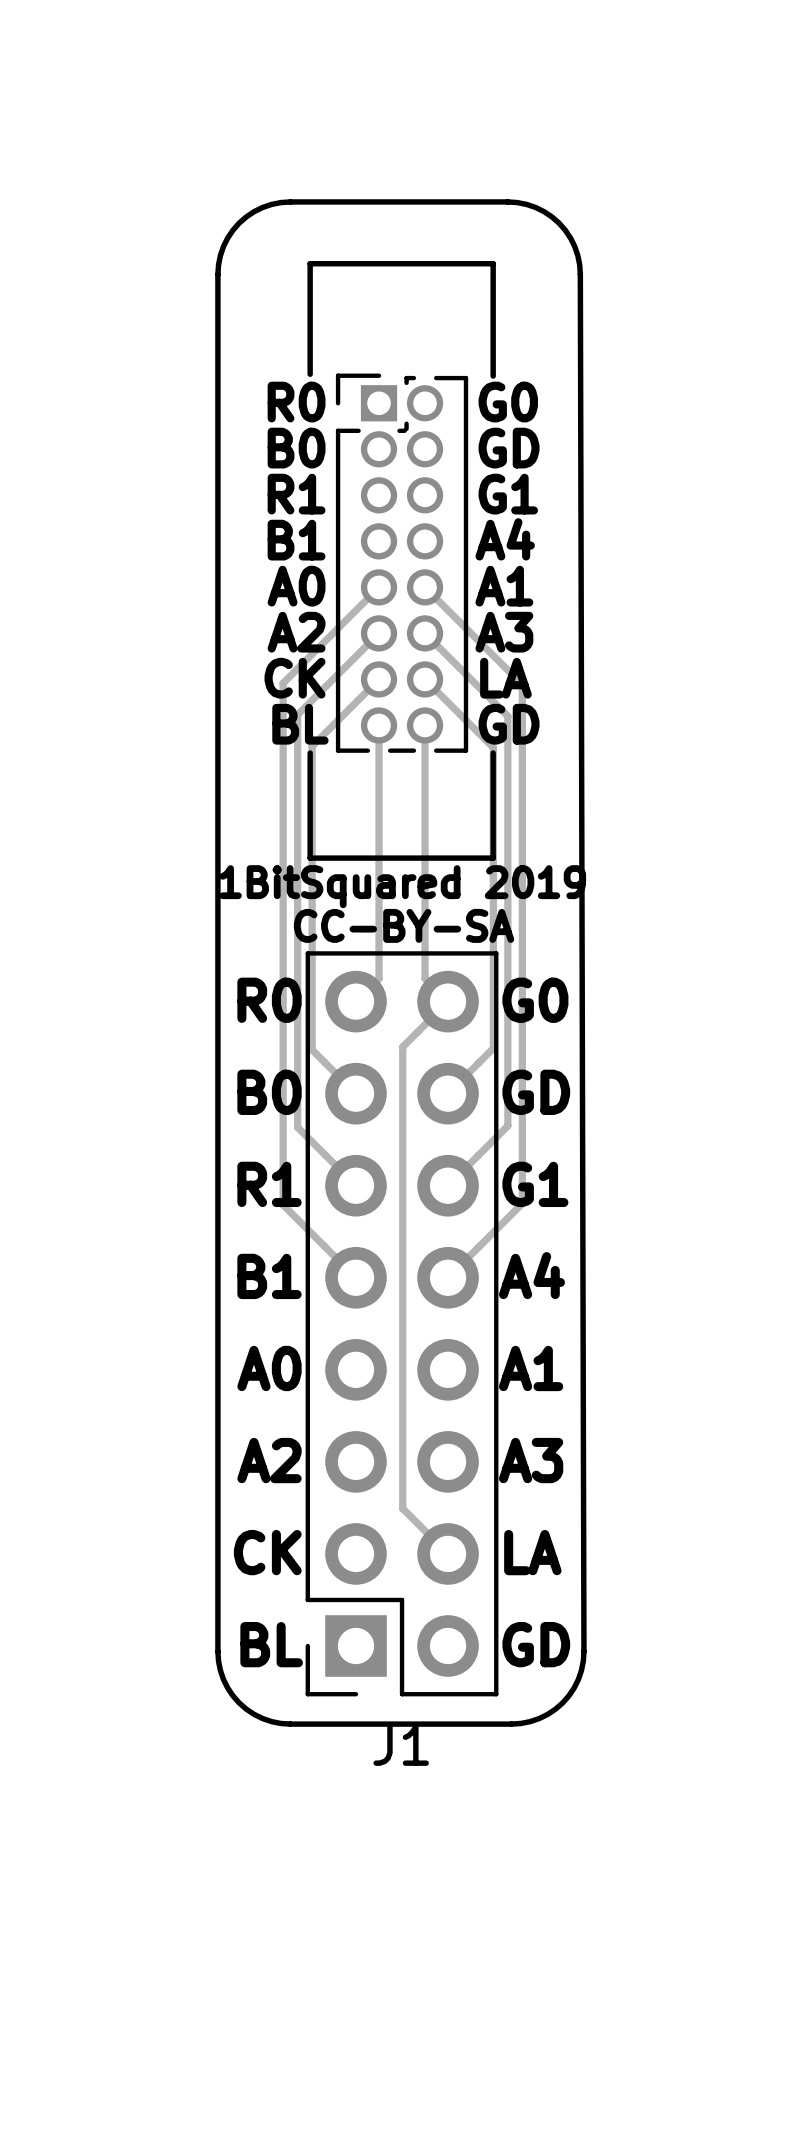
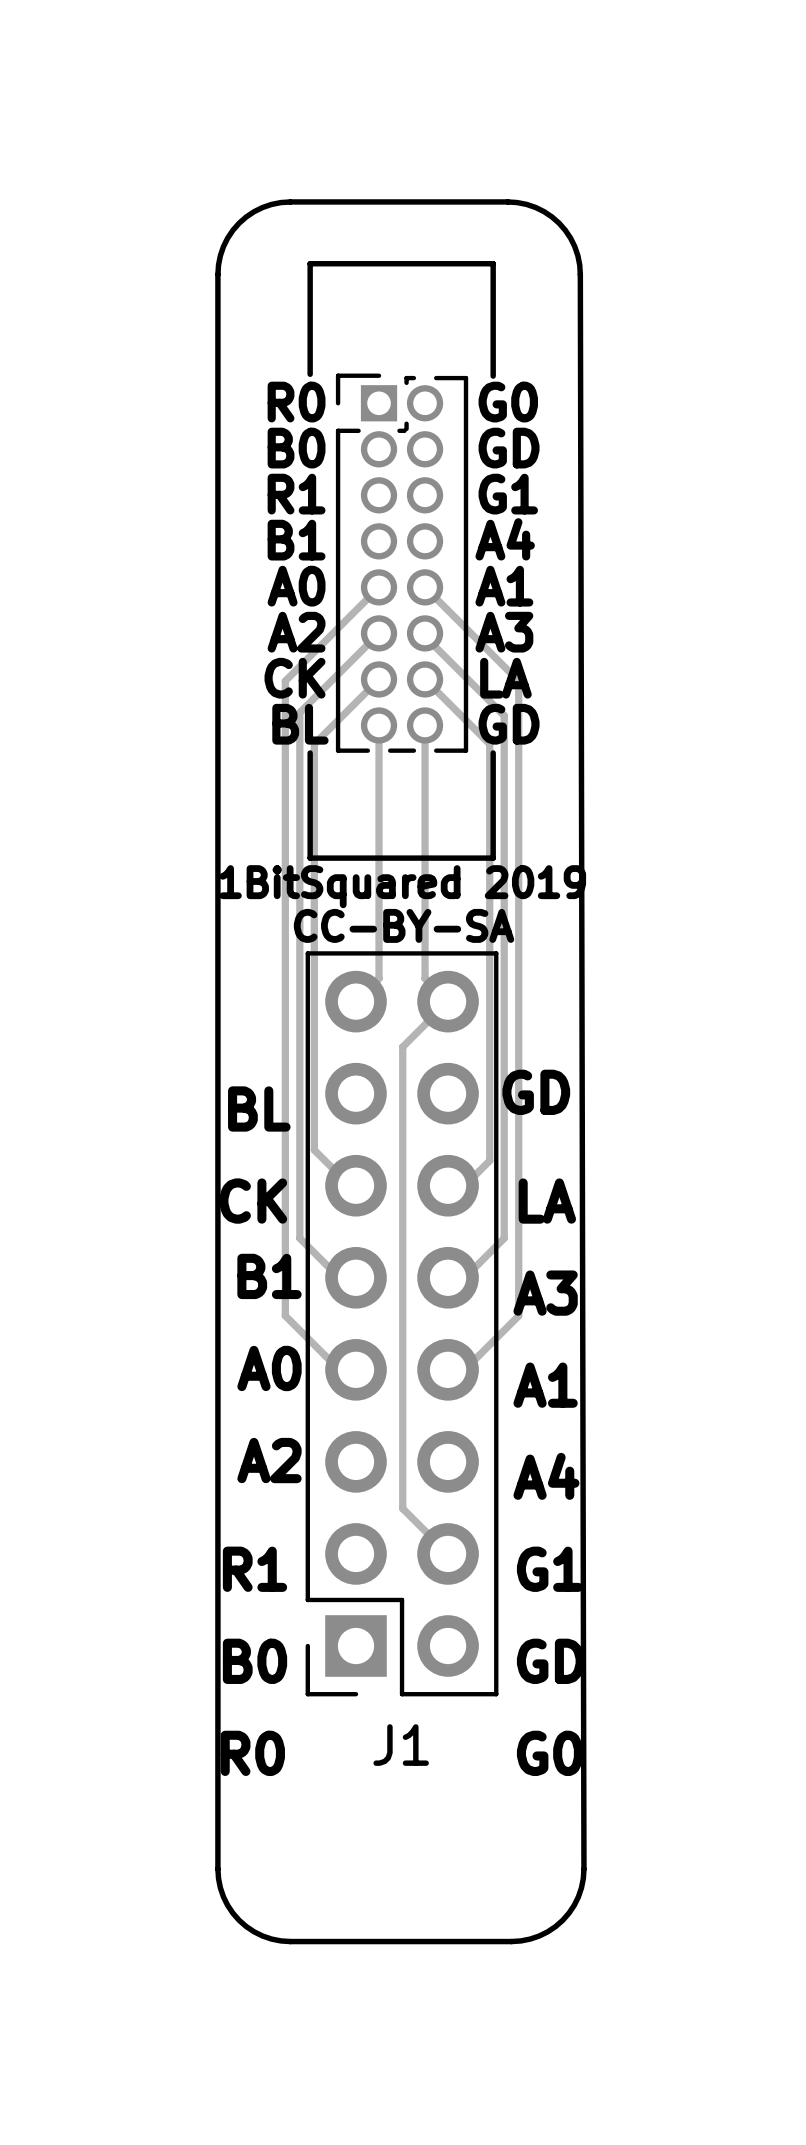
board edge: (580, 274) (583, 1651) (581, 1670) (574, 1687) (562, 1702) (547, 1714) (520, 1723) (290, 1724) (262, 1718) (239, 1702) (223, 1679) (217, 1651) -> (580, 274) (583, 1869) (581, 1887) (568, 1913) (547, 1931) (530, 1939) (511, 1941) (290, 1941) (262, 1936) (246, 1926) (227, 1905) (218, 1878) (217, 1651)
track: (425, 633) (507, 716) (507, 1125) (448, 1185) -> (425, 633) (425, 636) (504, 715) (504, 1238) (448, 1294)
track: (285, 681) (283, 683) (283, 1204) (356, 1277) -> (285, 681) (285, 1315) (356, 1386)
track: (518, 681) (522, 684) (522, 1203) (448, 1277) -> (518, 681) (518, 1315) (448, 1386)
track: (299, 712) (297, 714) (297, 1127) (356, 1185) -> (299, 712) (299, 1238) (356, 1294)
track: (314, 744) (312, 746) (312, 1049) (356, 1093) -> (314, 744) (314, 1150) (356, 1191) (356, 1202)
track: (489, 744) (493, 747) (493, 1048) (448, 1093) -> (489, 744) (489, 1160) (448, 1202)
text position: R0 (269, 1000) -> R0 (252, 1753)
text position: G0 (535, 1000) -> G0 (549, 1753)
text position: B0 (269, 1092) -> B0 (255, 1661)
text position: R1 (269, 1184) -> R1 (255, 1569)
text position: G1 (535, 1184) -> G1 (549, 1569)
text position: A4 (531, 1275) -> A4 (546, 1476)
text position: A1 (531, 1368) -> A1 (545, 1385)
text position: A3 (531, 1460) -> A3 (545, 1293)
text position: CK (267, 1552) -> CK (253, 1201)
text position: LA (532, 1552) -> LA (547, 1201)
text position: BL (271, 1644) -> BL (259, 1108)
text position: GD (536, 1644) -> GD (550, 1661)

